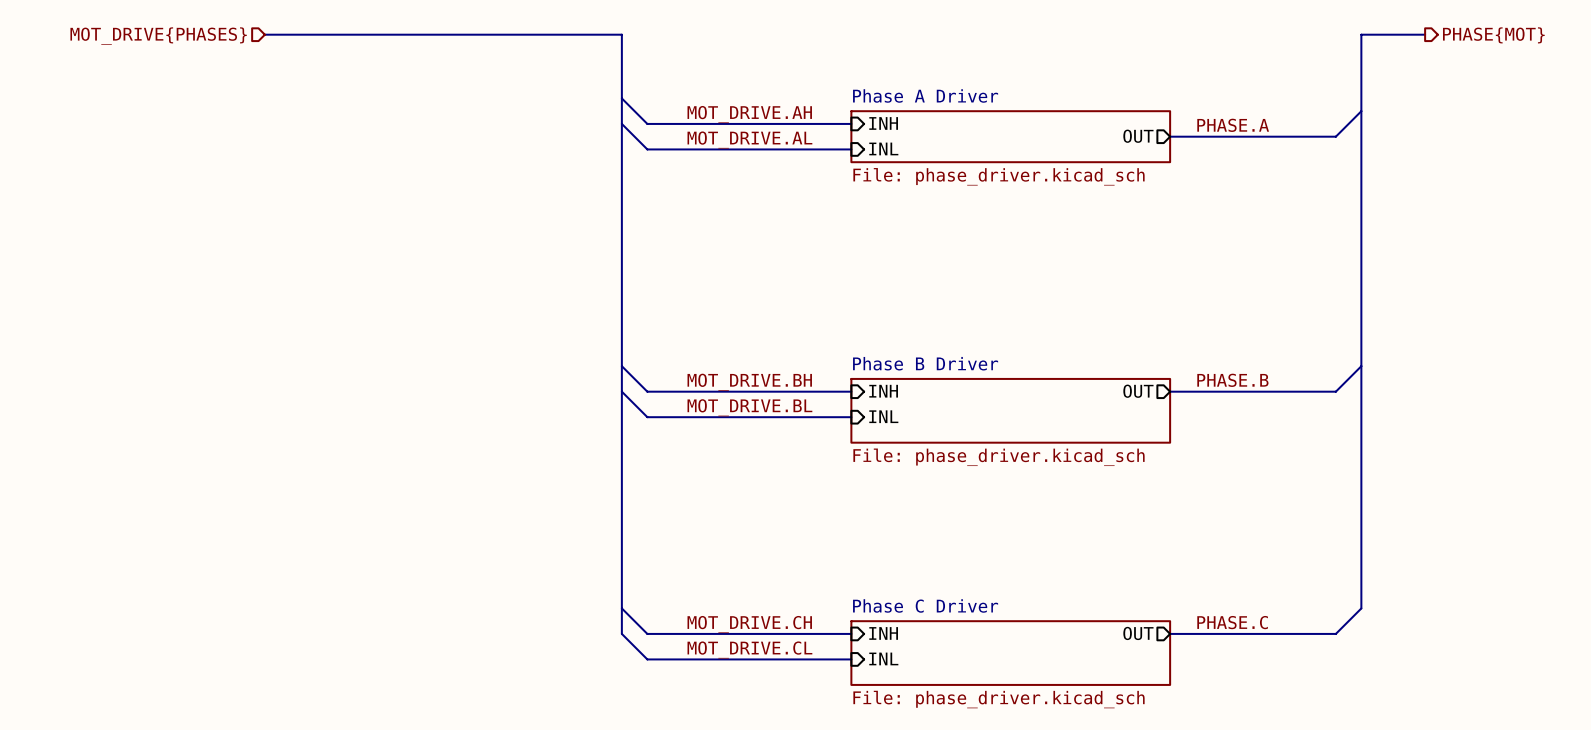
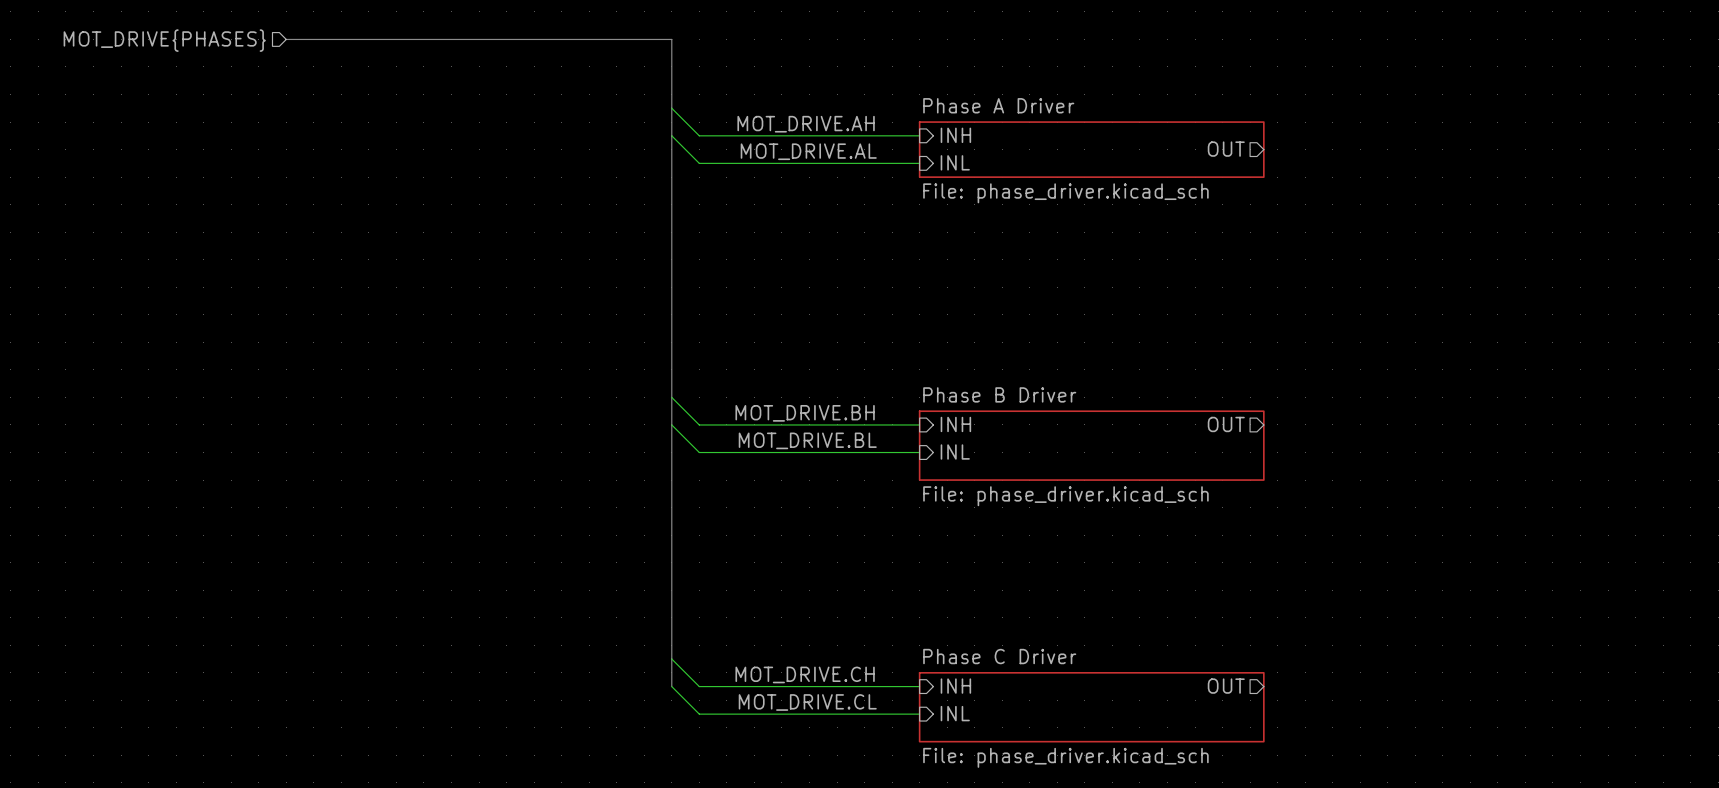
bus: (1425, 34) (1361, 34) (1361, 608) -> none
hierarchical label: PHASE{MOT} (1493, 35) -> none
wire: (1361, 111) (1335, 136) (1170, 136) -> none
label: PHASE.A (1233, 125) -> none
wire: (1361, 366) (1335, 391) (1170, 391) -> none
label: PHASE.B (1232, 380) -> none
wire: (1361, 608) (1335, 633) (1170, 633) -> none
label: PHASE.C (1232, 622) -> none

